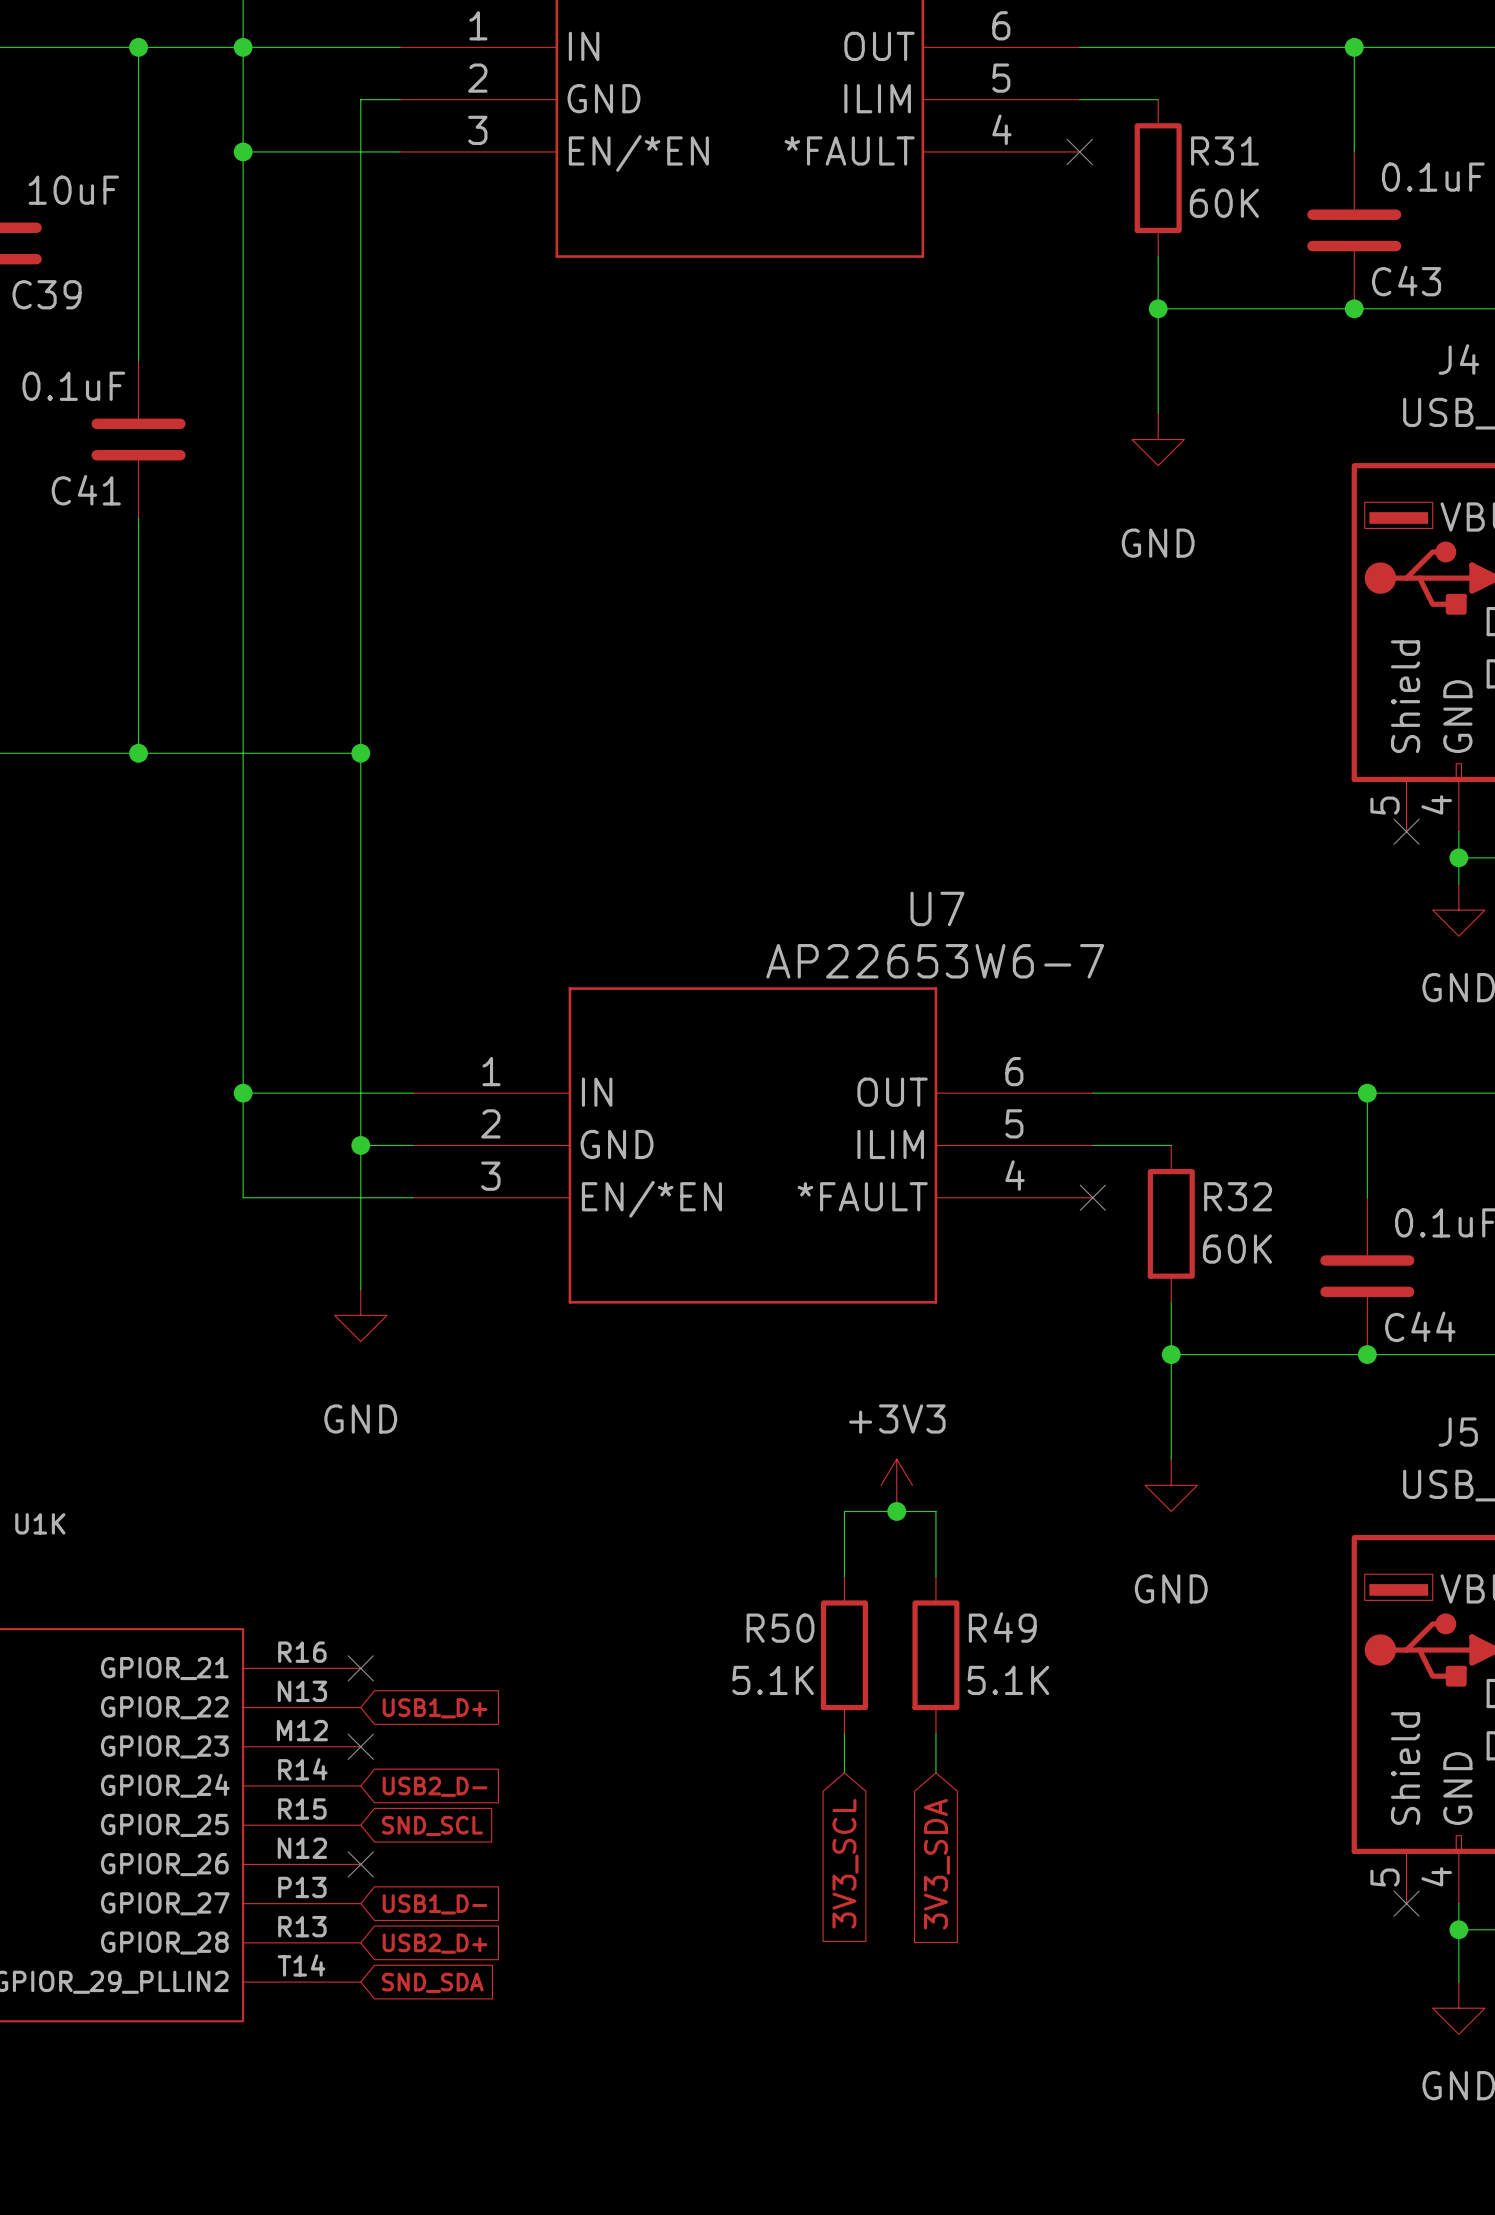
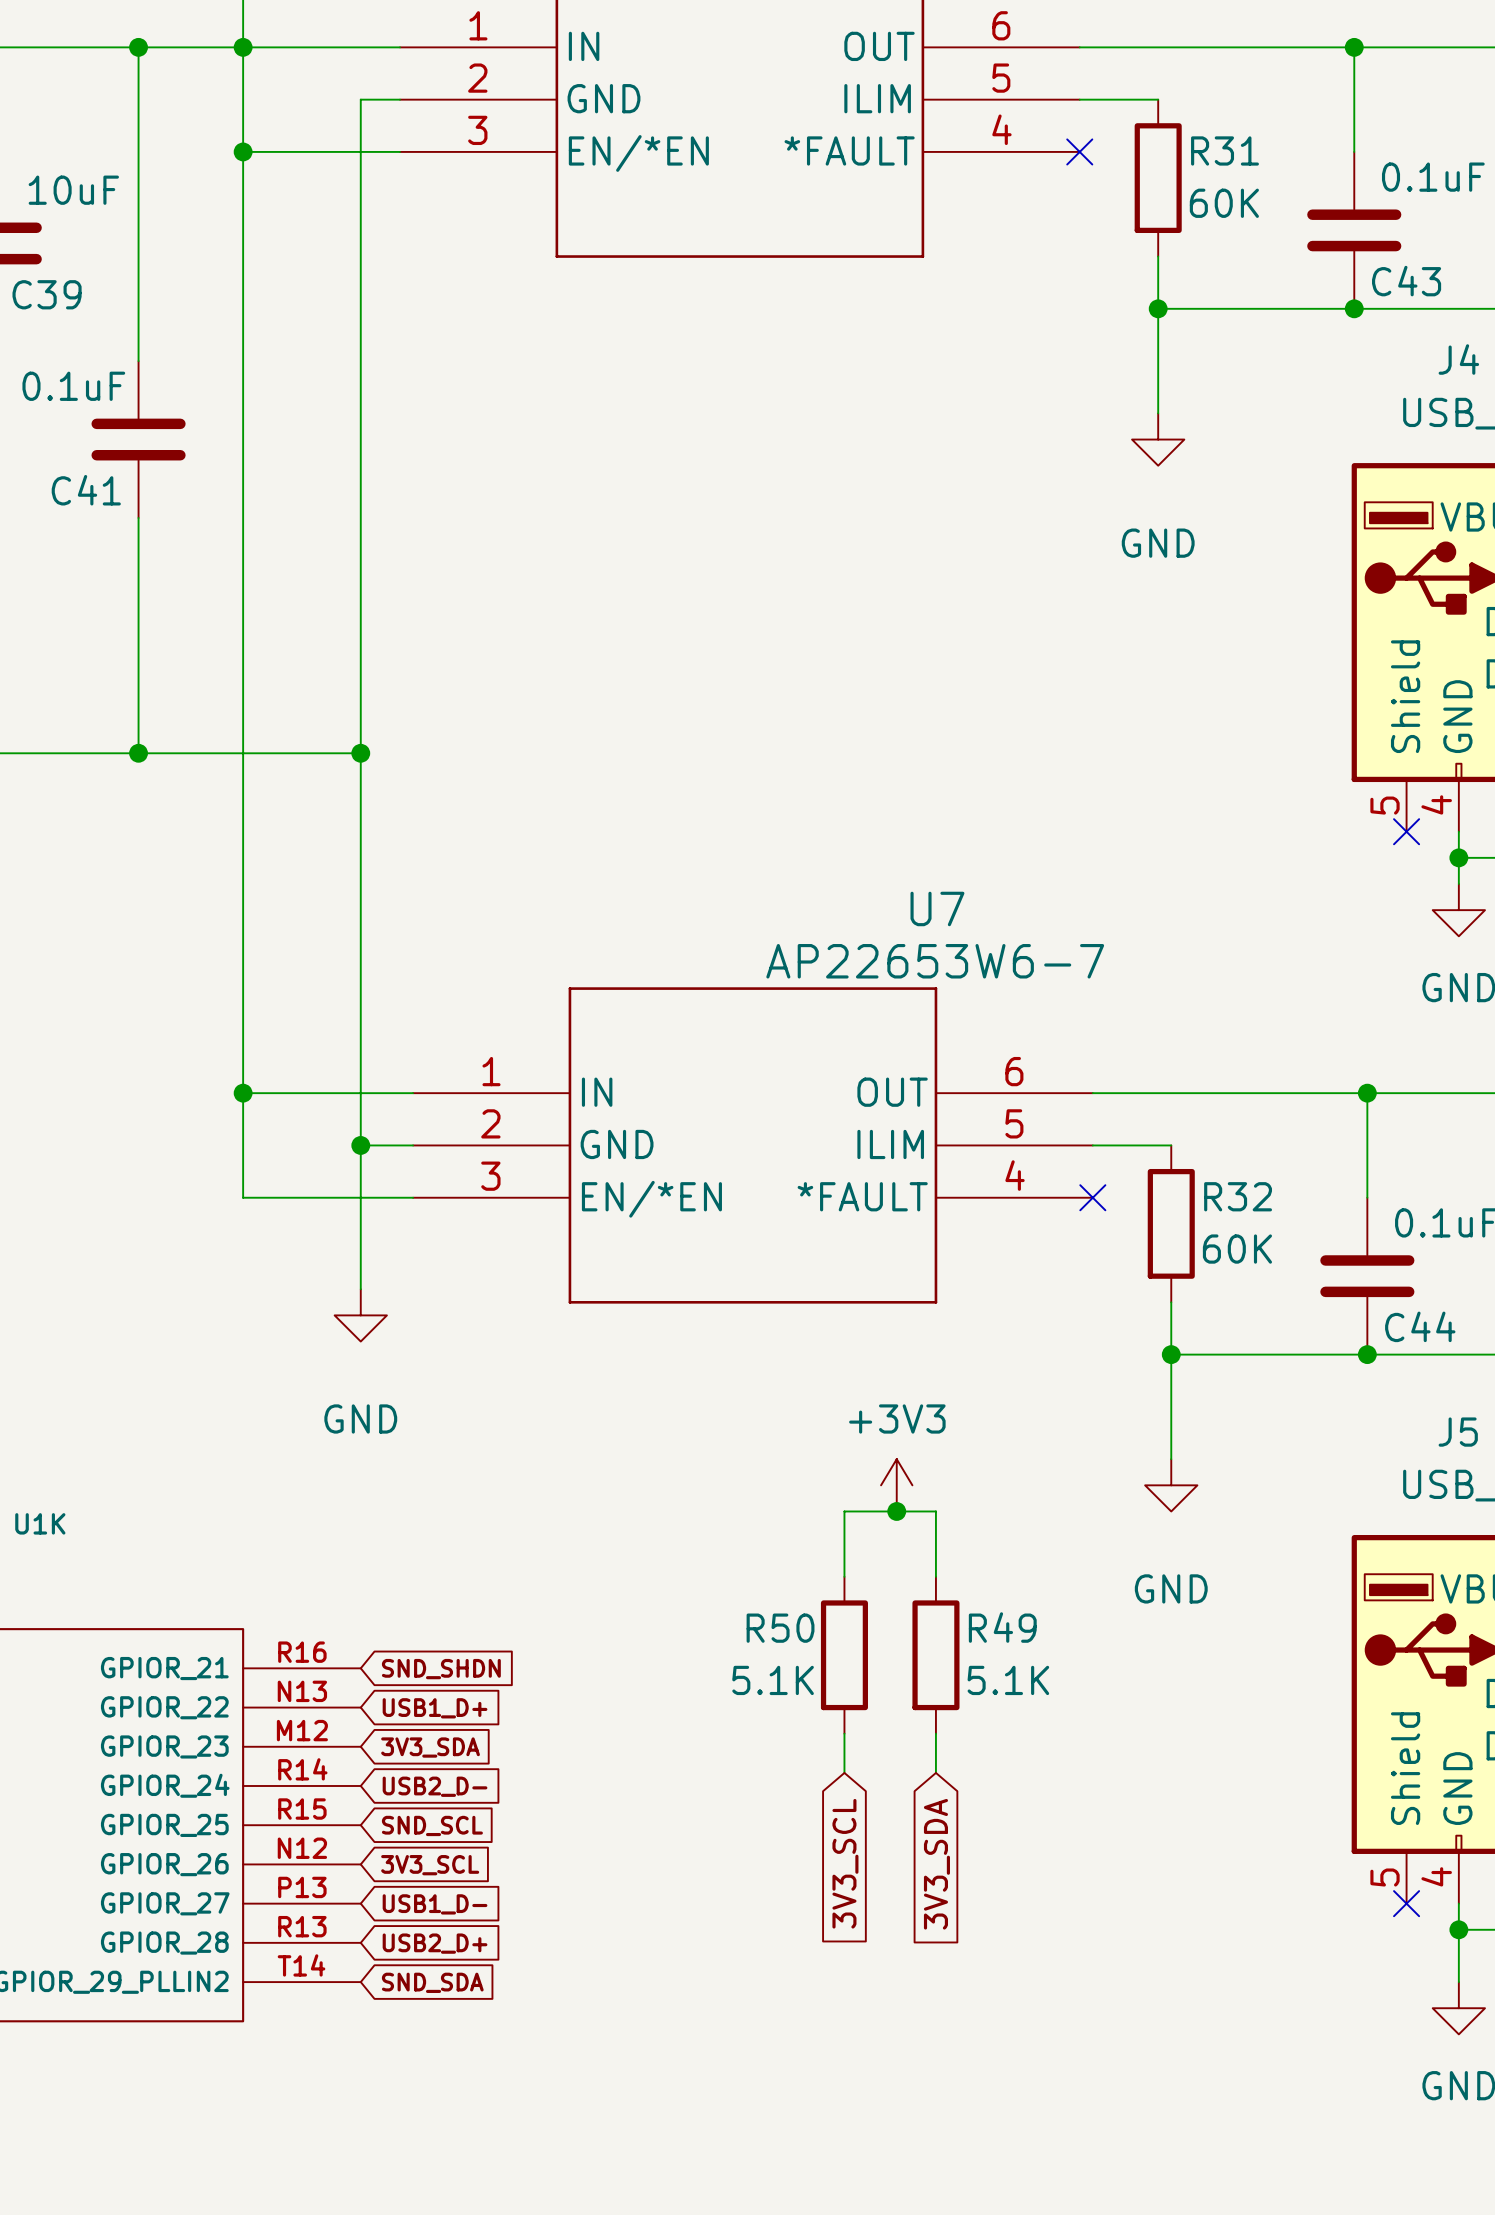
no-connect mark: (360, 1668) -> none
global label: none -> SND_SHDN (441, 1669)
no-connect mark: (360, 1746) -> none
global label: none -> 3V3_SDA (430, 1747)
no-connect mark: (360, 1864) -> none
global label: none -> 3V3_SCL (430, 1865)

